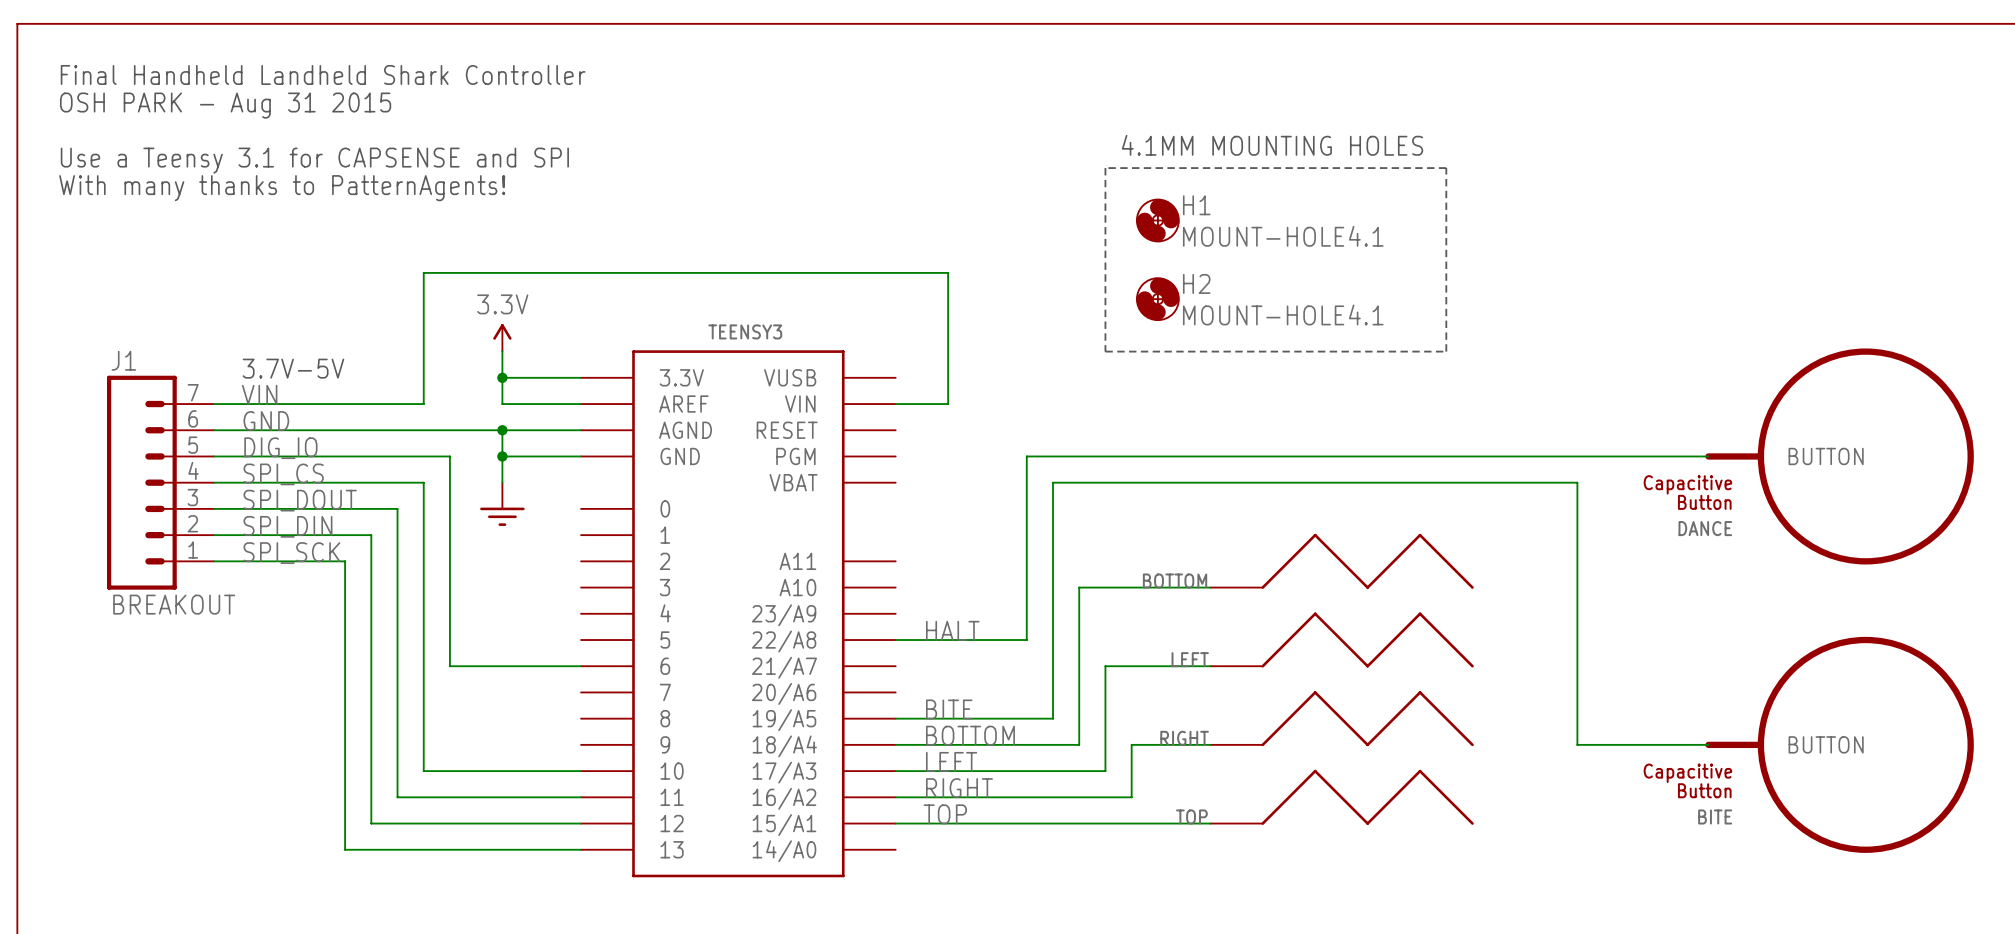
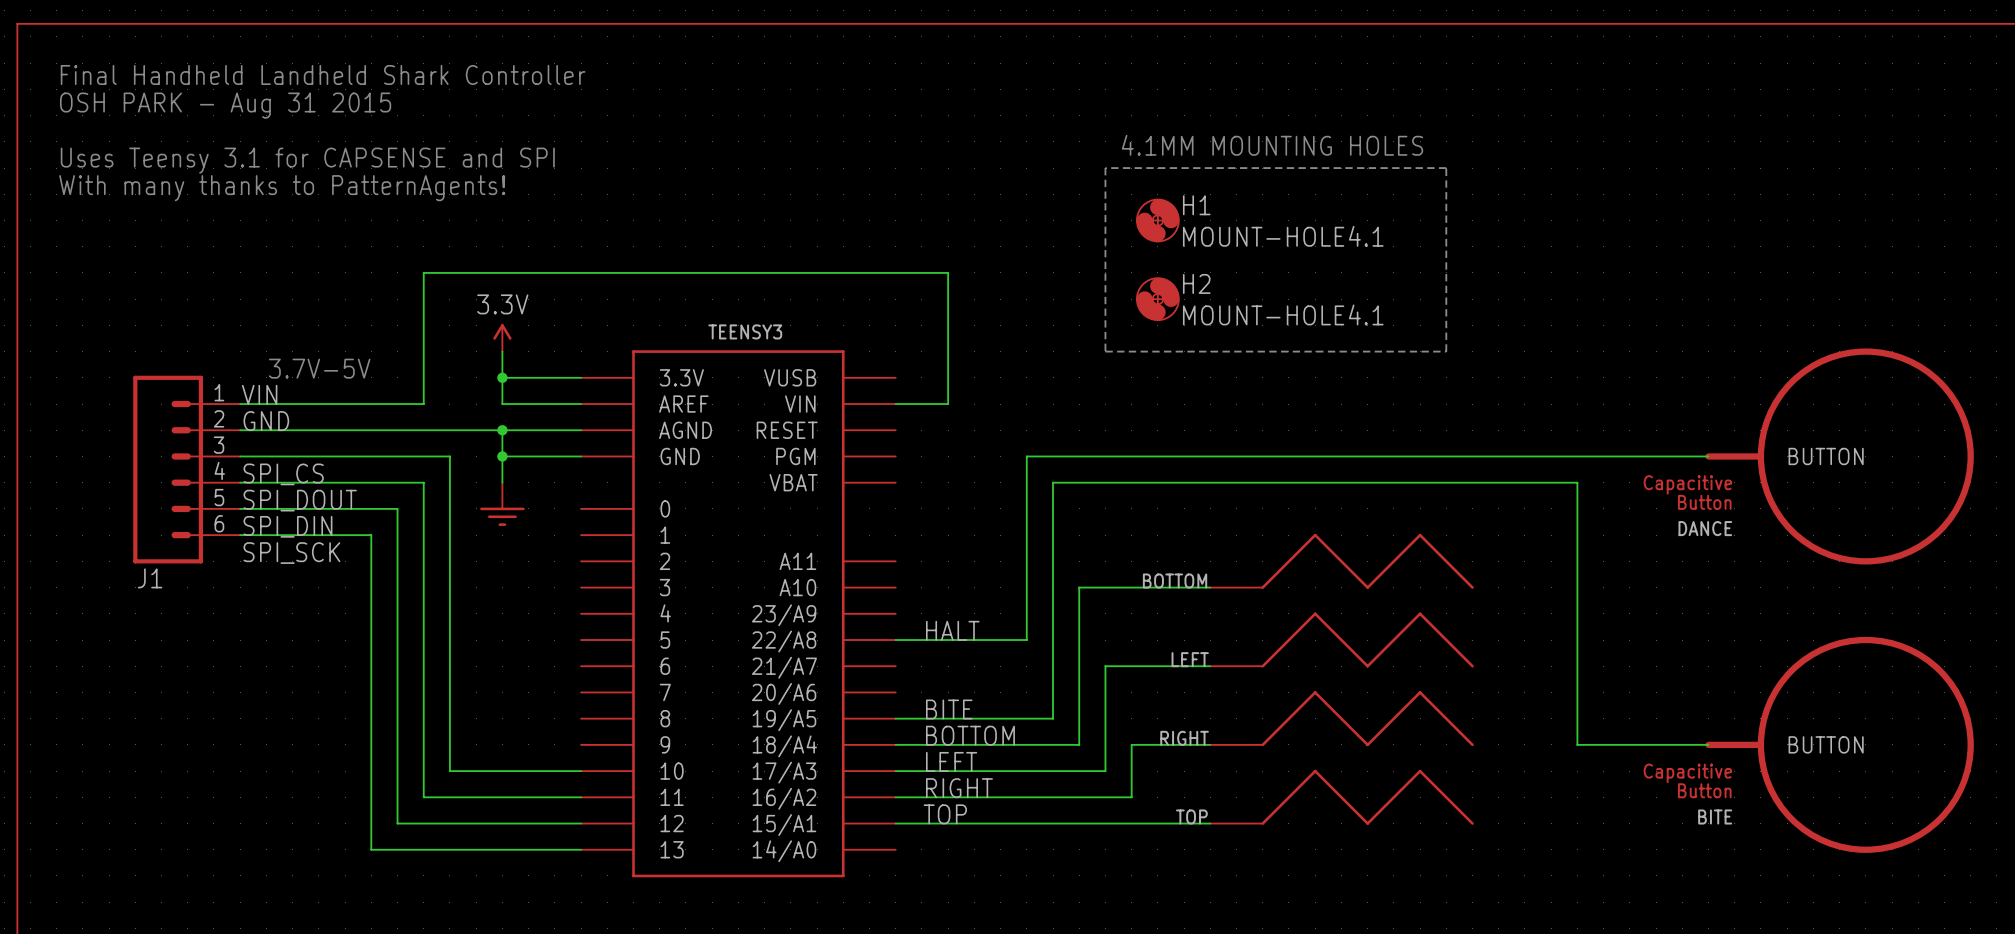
text: Use a Teensy 3.1 for CAPSENSE and SPI (314, 160) -> Uses Teensy 3.1 for CAPSENSE and SPI (307, 160)
J1 name position: J1 (123, 360) -> J1 (150, 578)
text position: 3.7V-5V (293, 368) -> 3.7V-5V (319, 368)
J1 symbol: [107, 375, 214, 590] -> [133, 375, 241, 564]
label: DIG_IO (280, 448) -> none
wire: (213, 561) (345, 561) (345, 849) (371, 849) -> none
J1 value: BREAKOUT (174, 604) -> none
wire: (449, 666) (581, 666) -> (449, 666) (449, 771)
wire: (423, 771) (449, 771) -> (423, 771) (423, 797)
wire: (397, 797) (423, 797) -> (397, 797) (397, 823)
wire: (371, 823) (397, 823) -> (371, 823) (371, 849)

